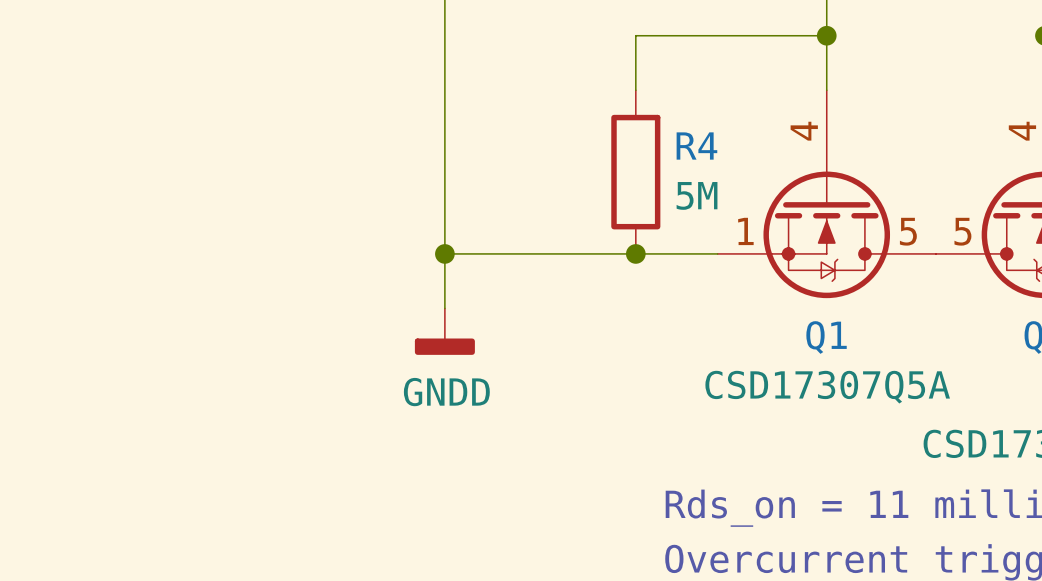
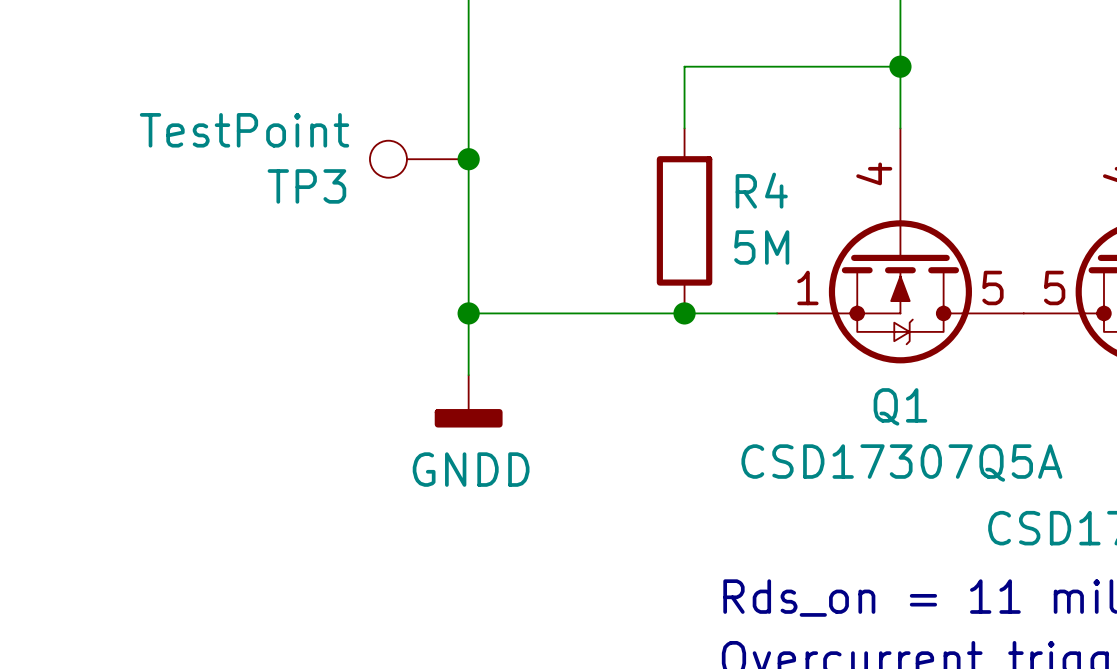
TP3: none -> TestPoint (419, 159)
junction: none -> (468, 159)

